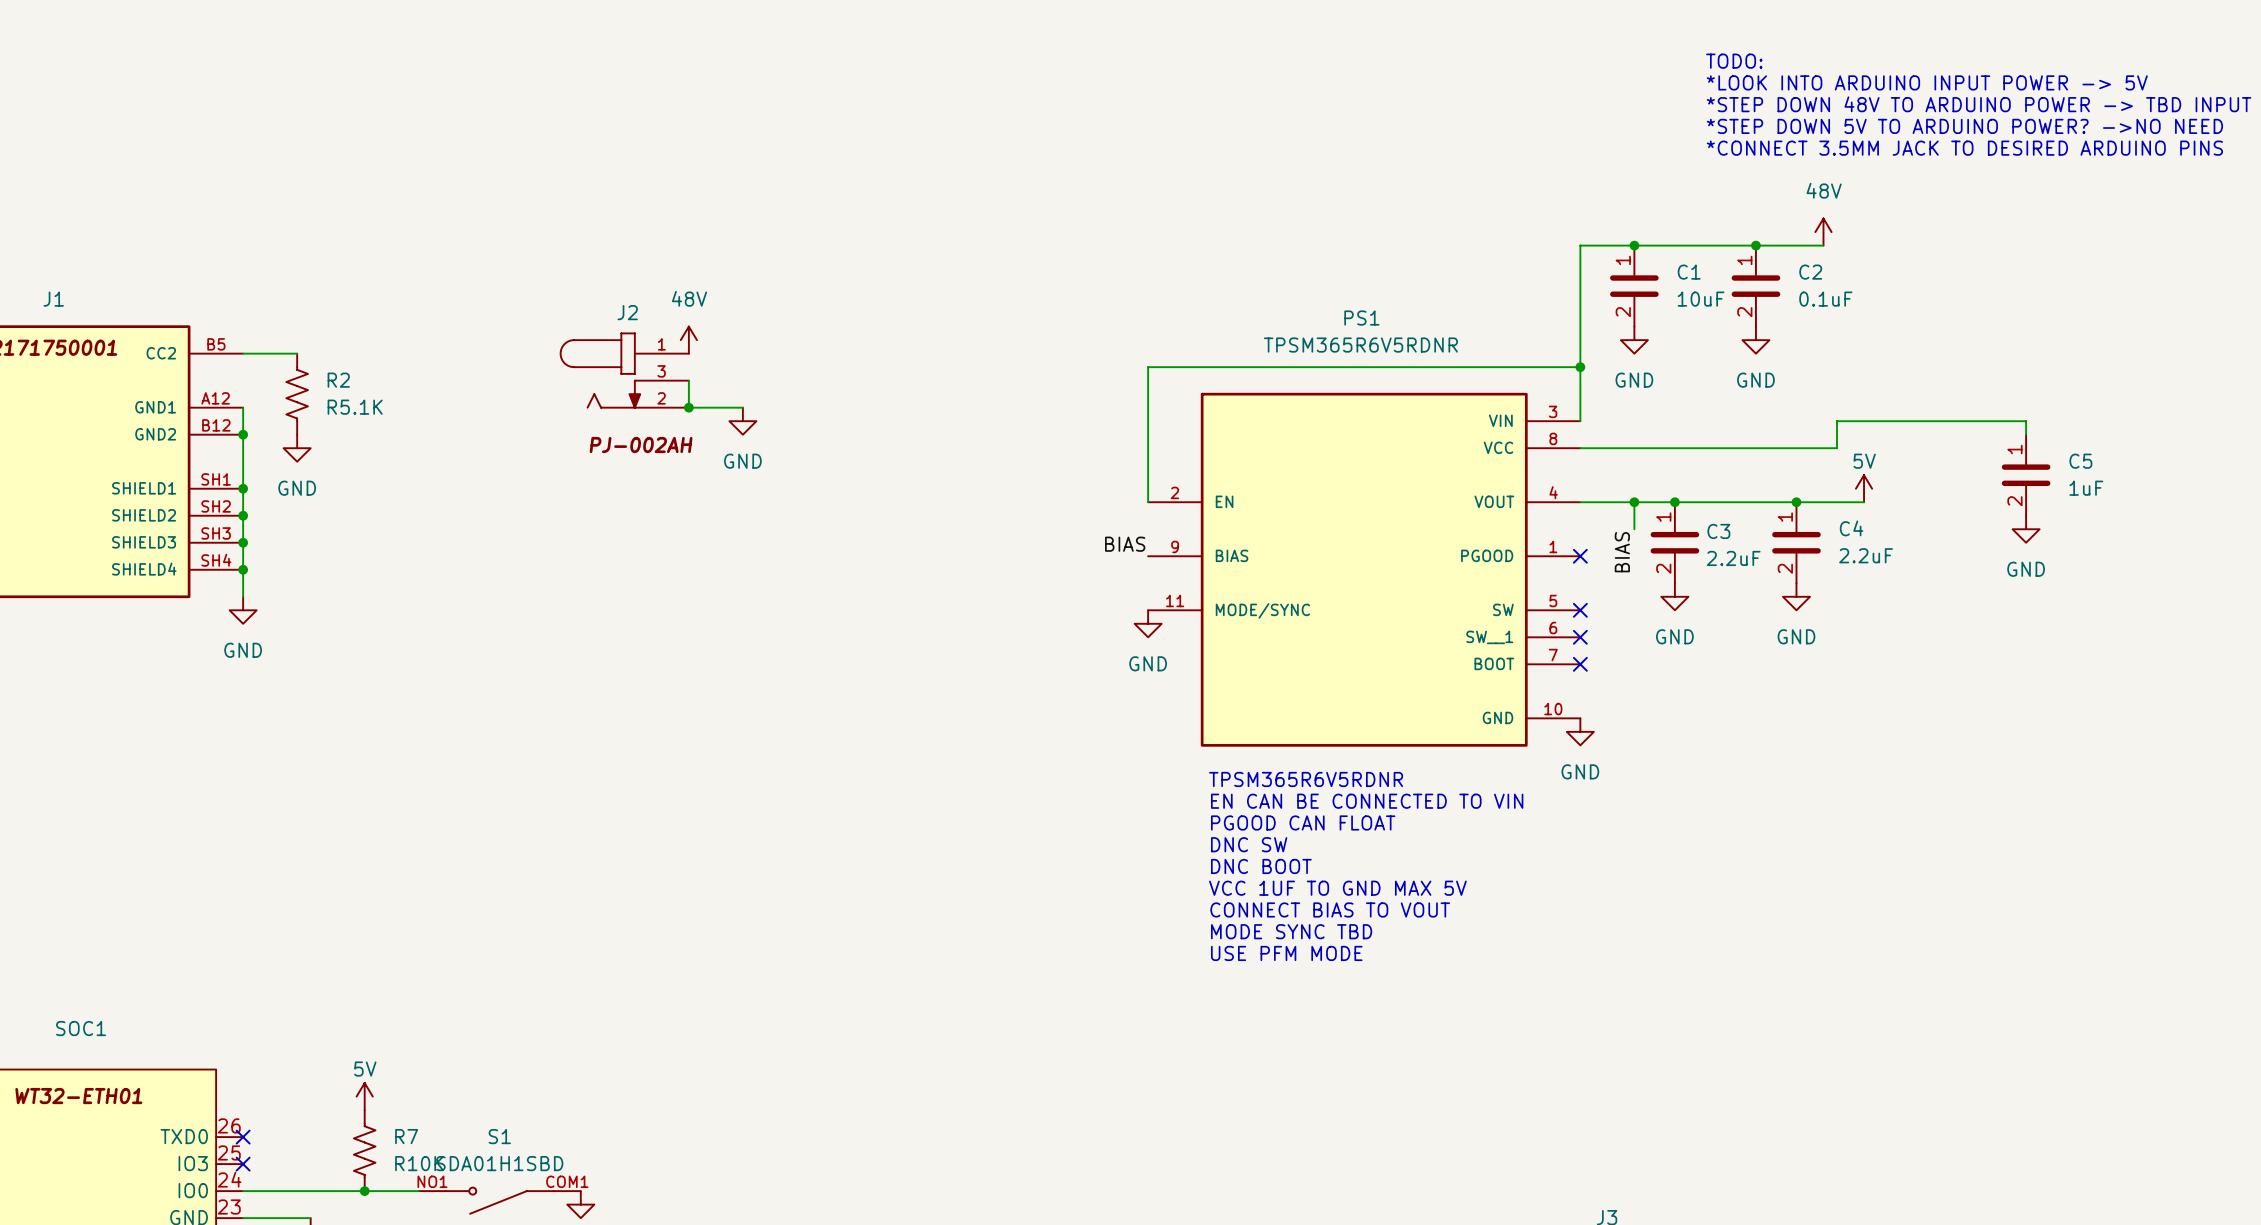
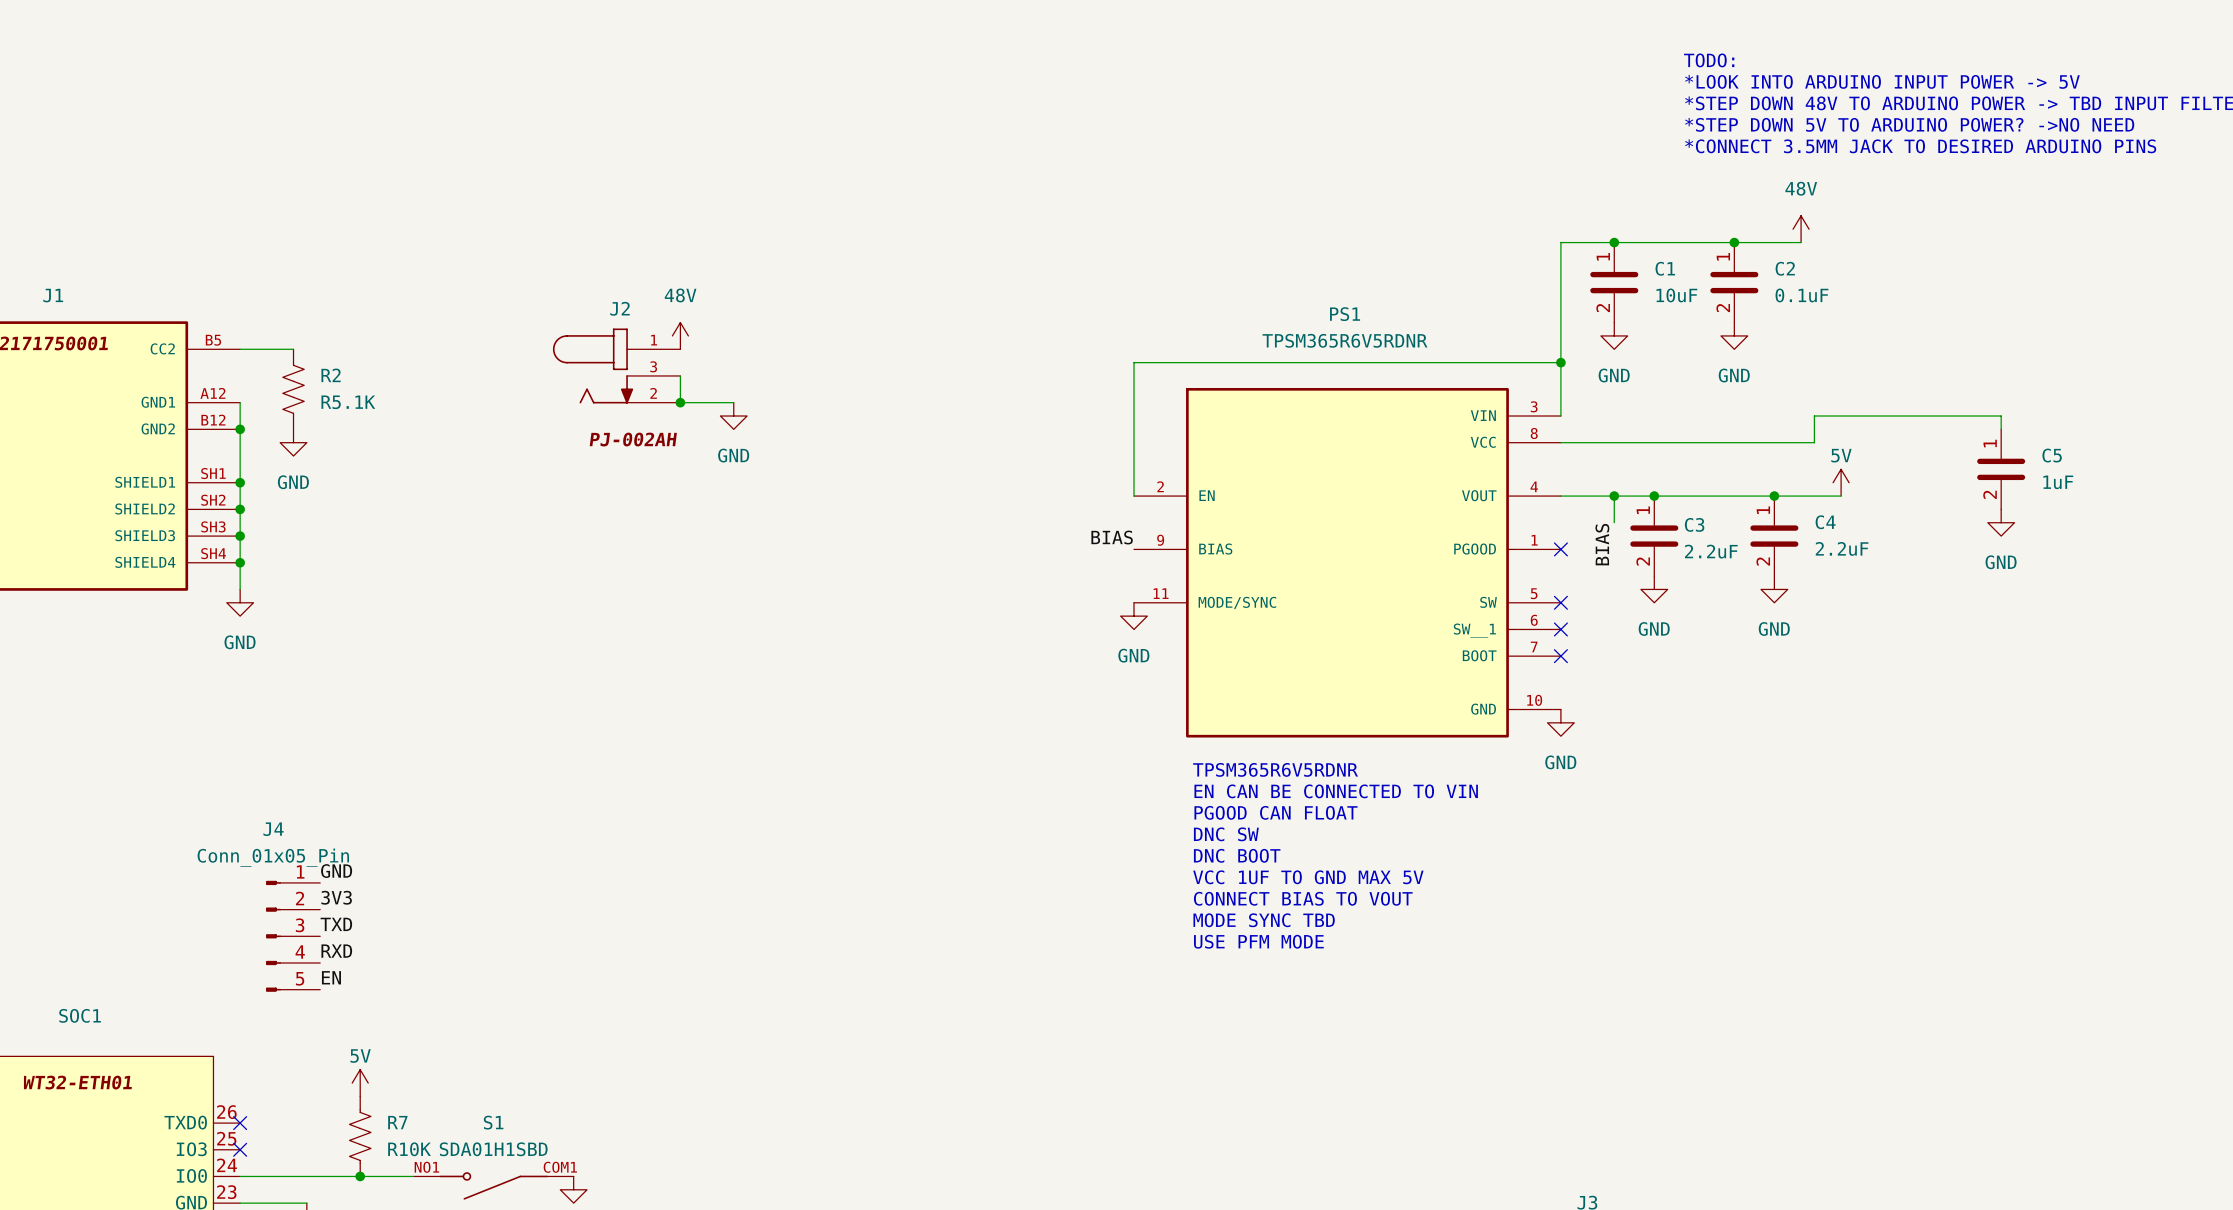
label: none -> GND (336, 871)
label: none -> 3V3 (336, 897)
label: none -> TXD (336, 924)
J4: none -> Conn_01x05_Pin (293, 936)
label: none -> RXD (336, 951)
label: none -> EN (331, 977)

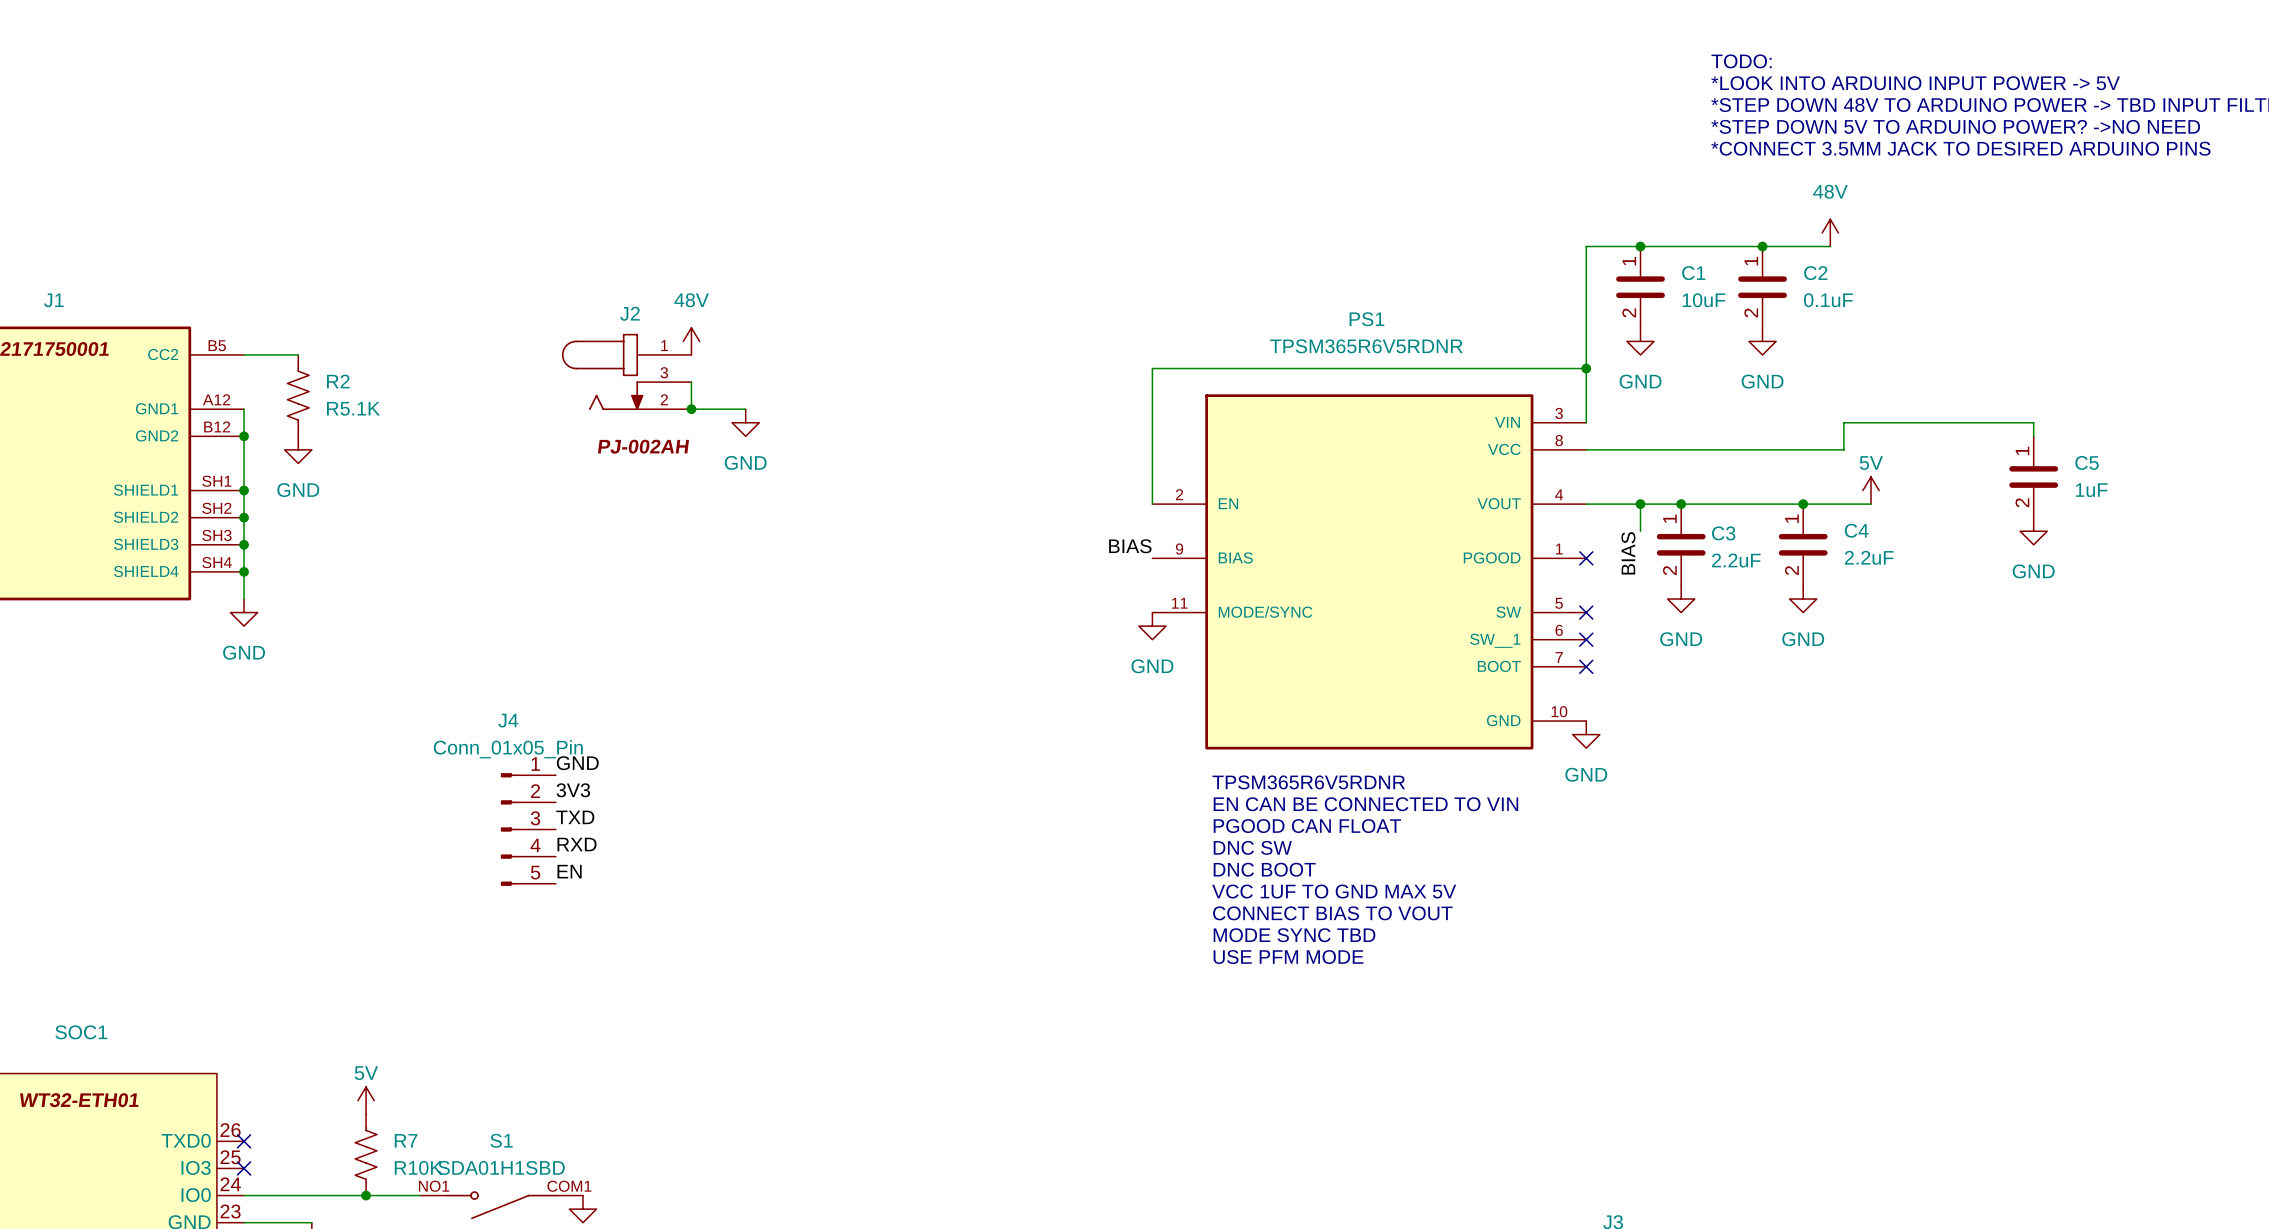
label position: GND (336, 871) -> GND (577, 763)
label position: 3V3 (336, 897) -> 3V3 (573, 790)
label position: TXD (336, 924) -> TXD (575, 817)
J4 position: (293, 936) -> (528, 829)
label position: RXD (336, 951) -> RXD (577, 844)
label position: EN (331, 977) -> EN (569, 871)

